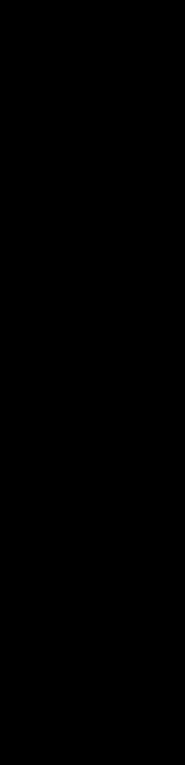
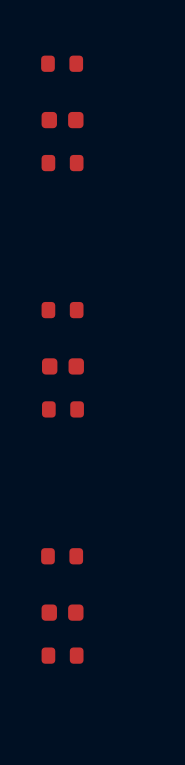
part: none -> (62, 63)
part: none -> (62, 120)
part: none -> (62, 163)
part: none -> (62, 310)
part: none -> (62, 366)
part: none -> (62, 409)
part: none -> (62, 556)
part: none -> (62, 612)
part: none -> (62, 655)

